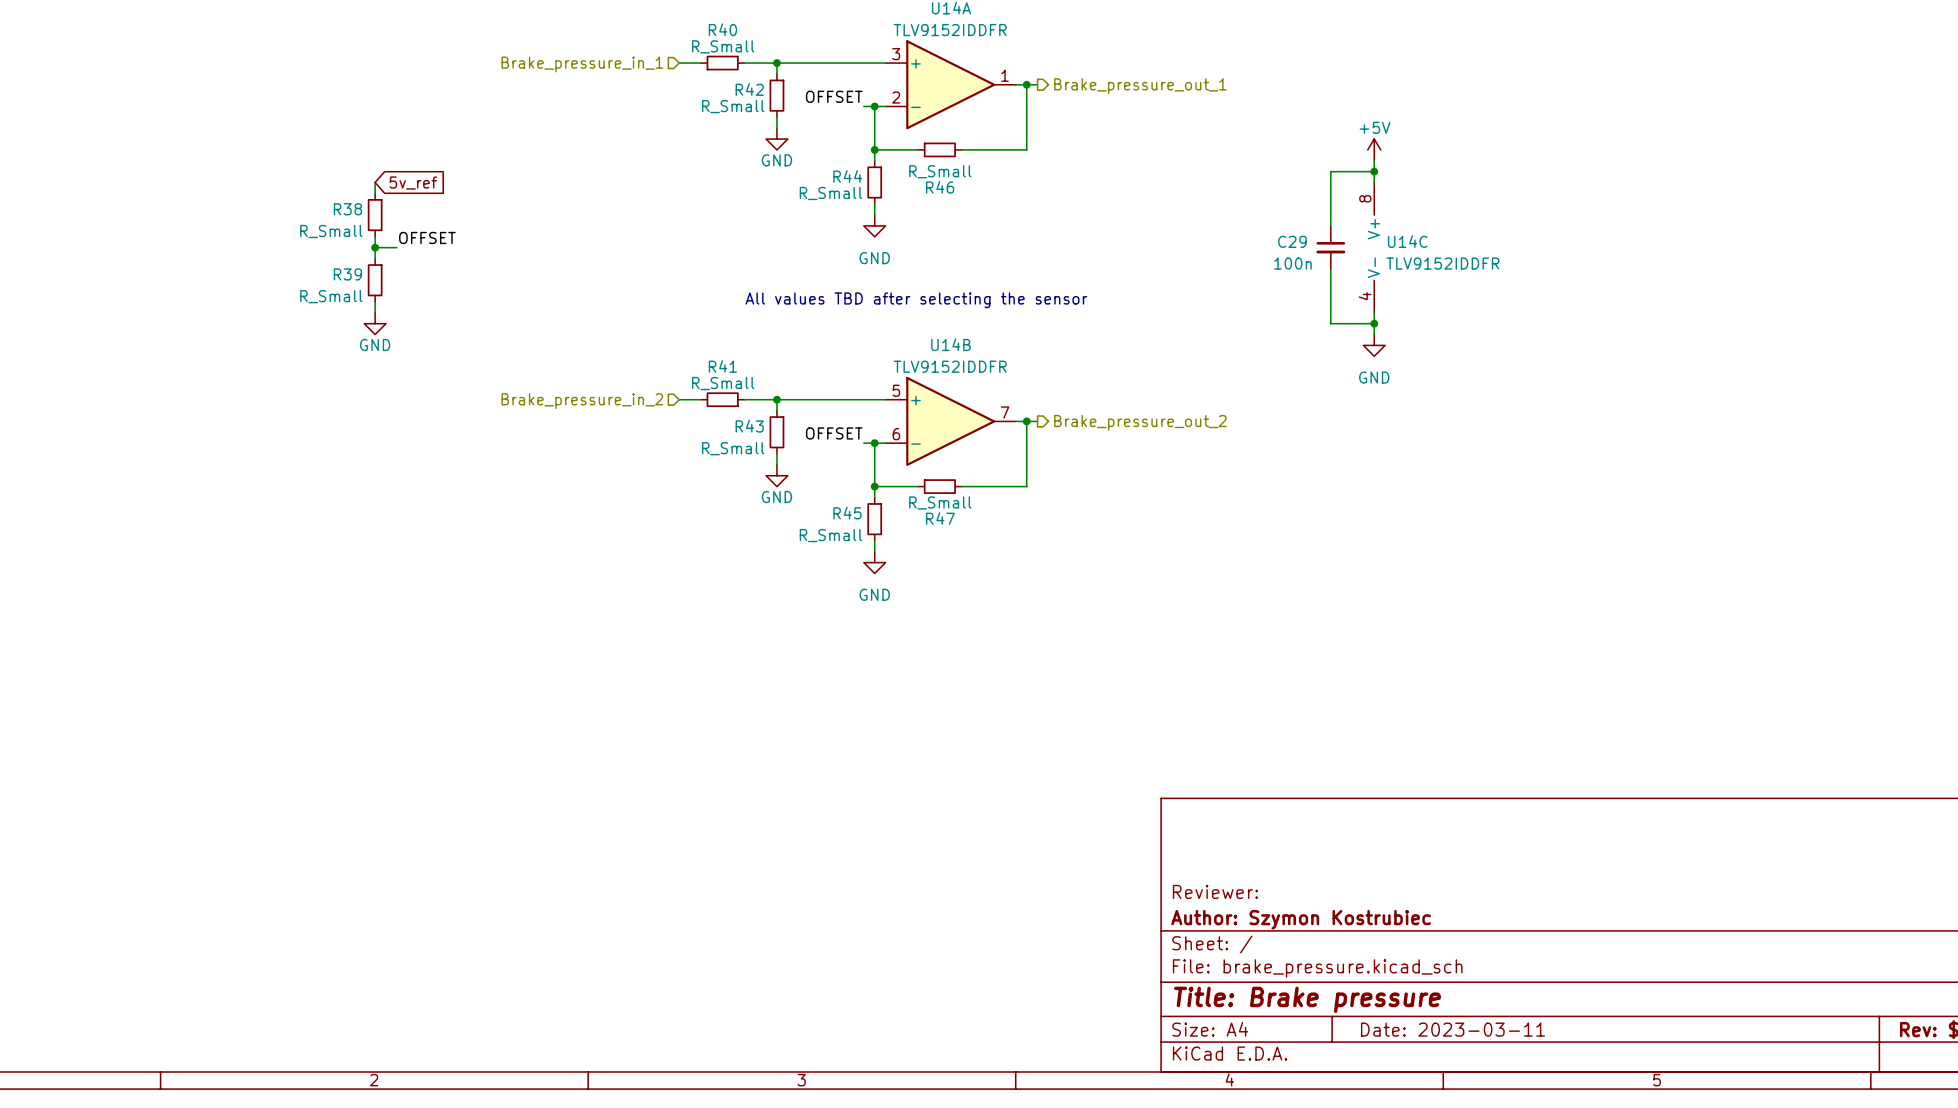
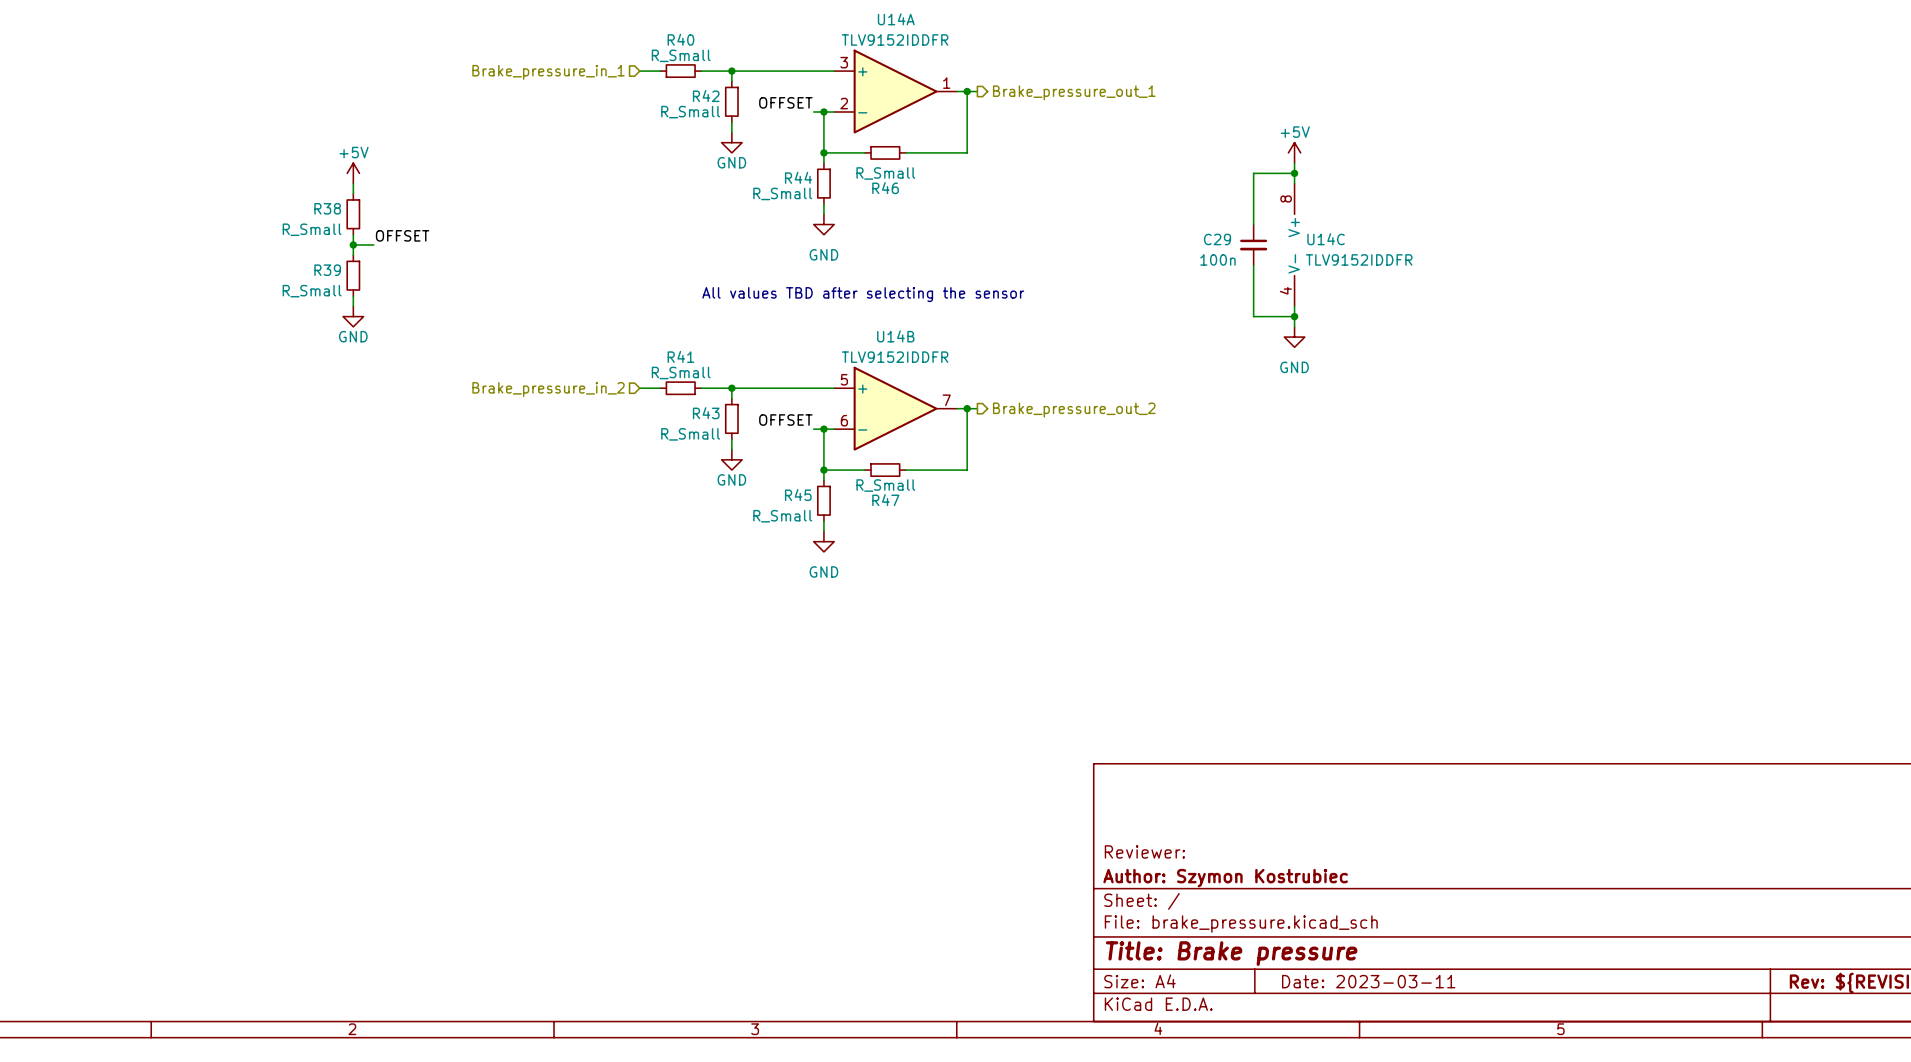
power symbol: none -> +5V (353, 173)
global label: 5v_ref (413, 183) -> none

